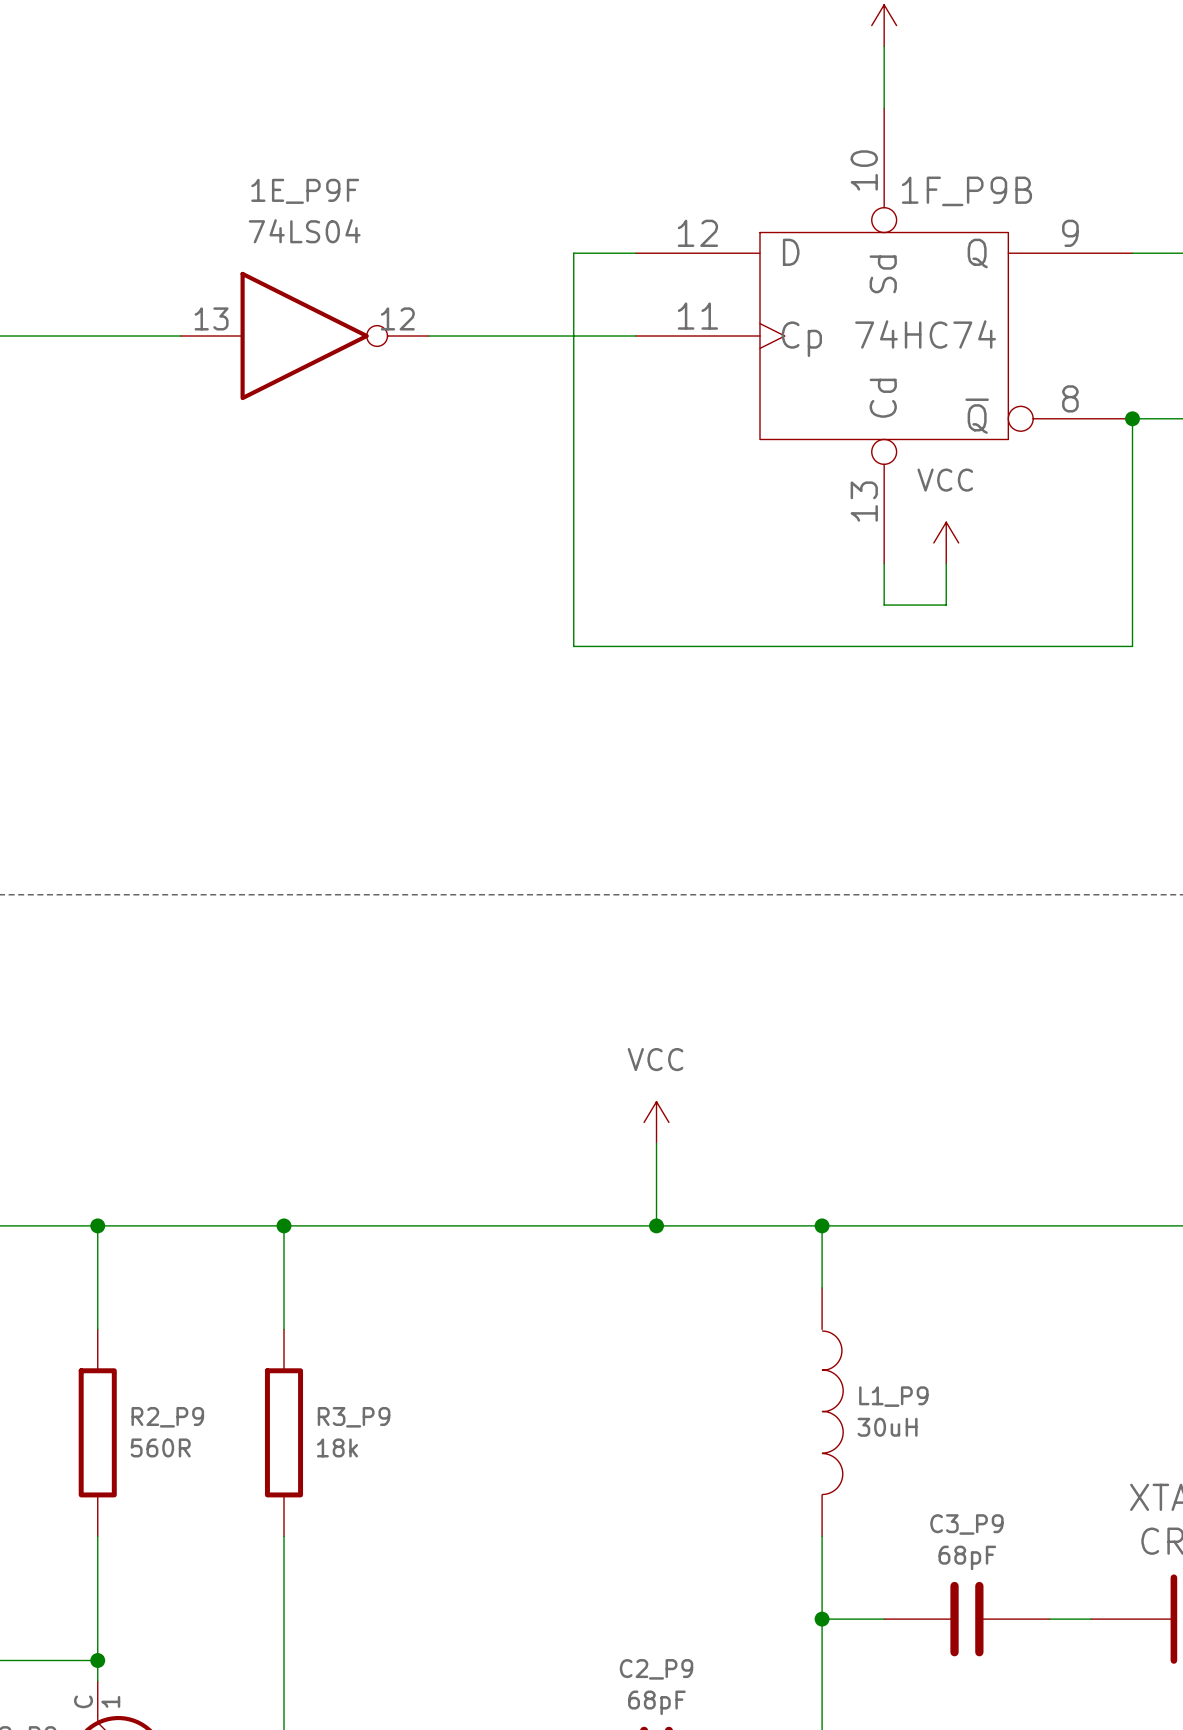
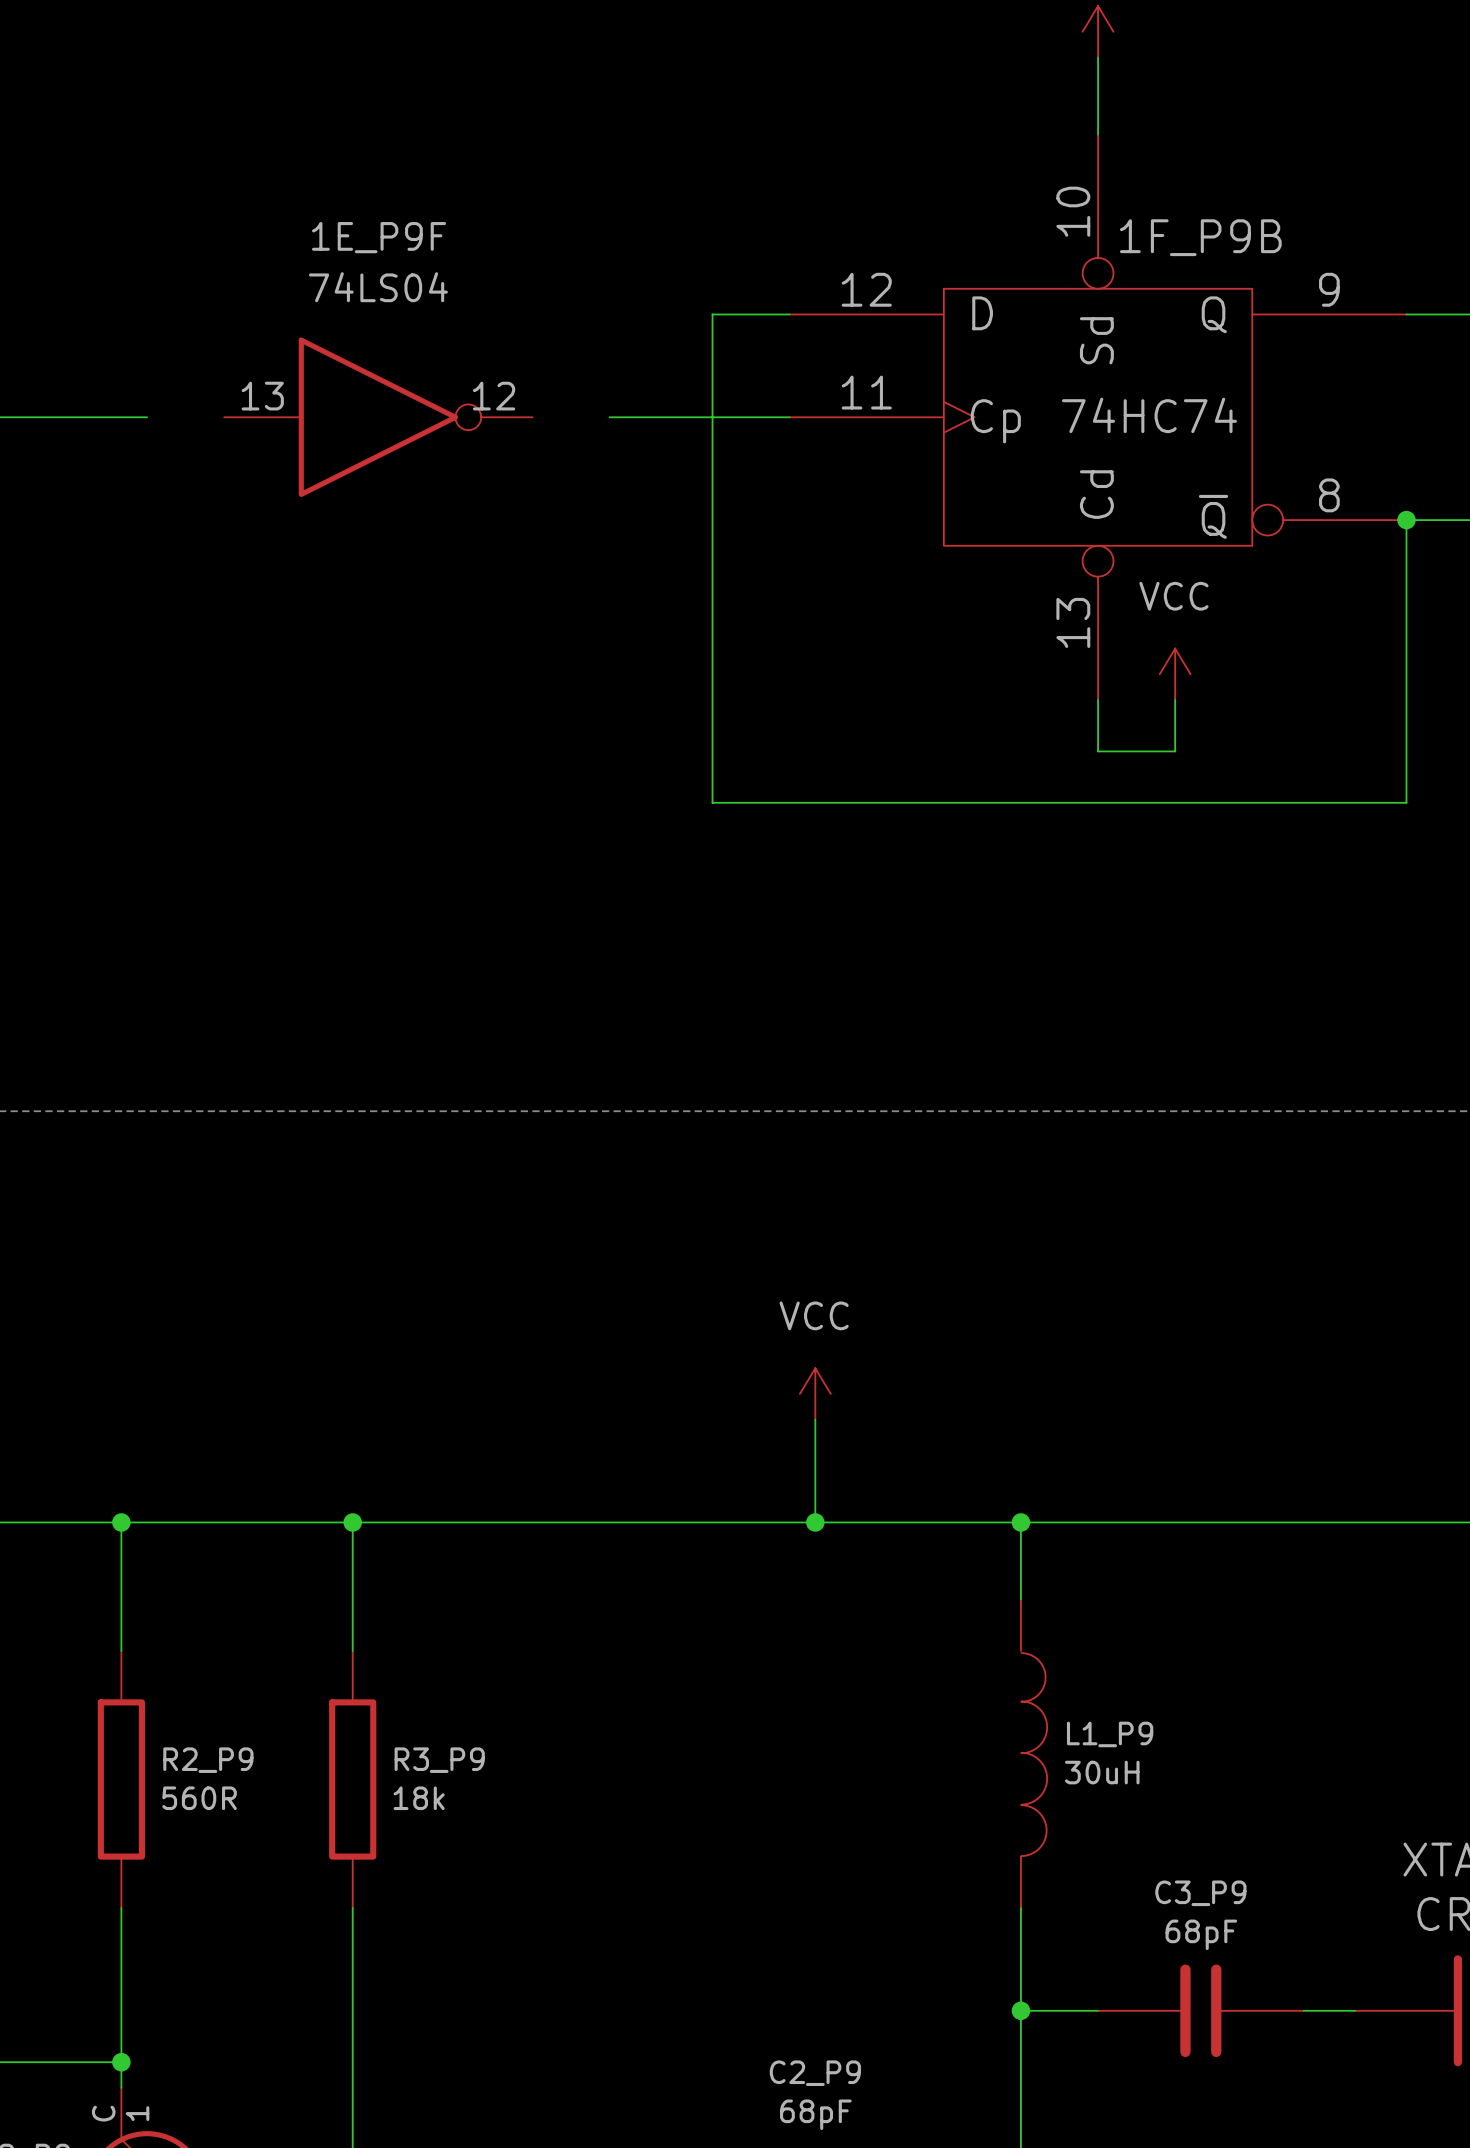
wire: (118, 336) (180, 336) -> none
wire: (428, 336) (490, 336) -> none

